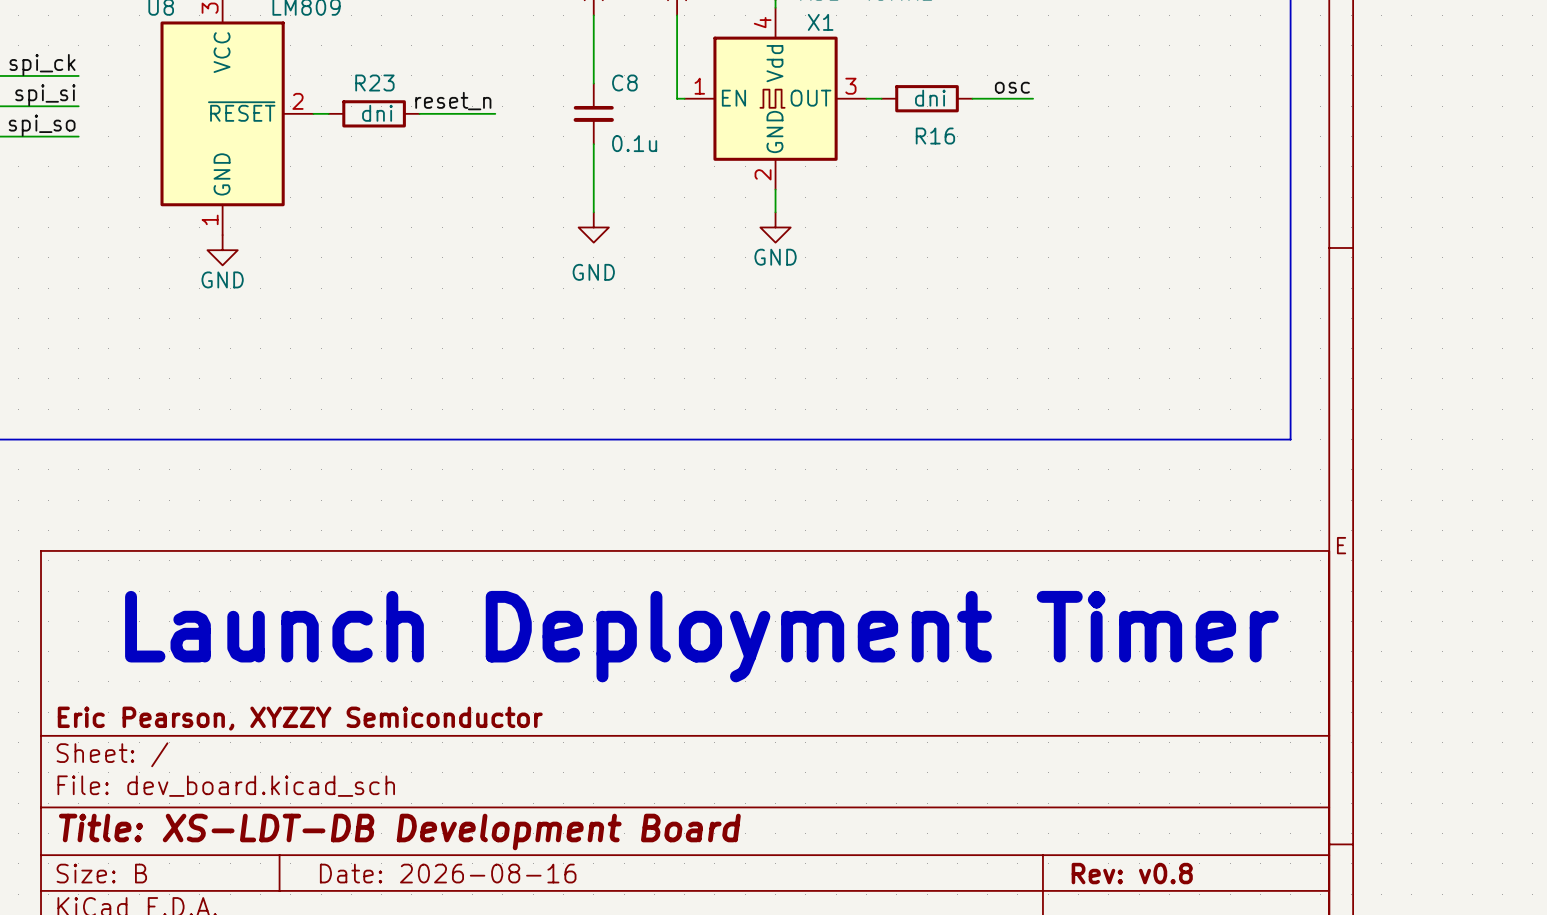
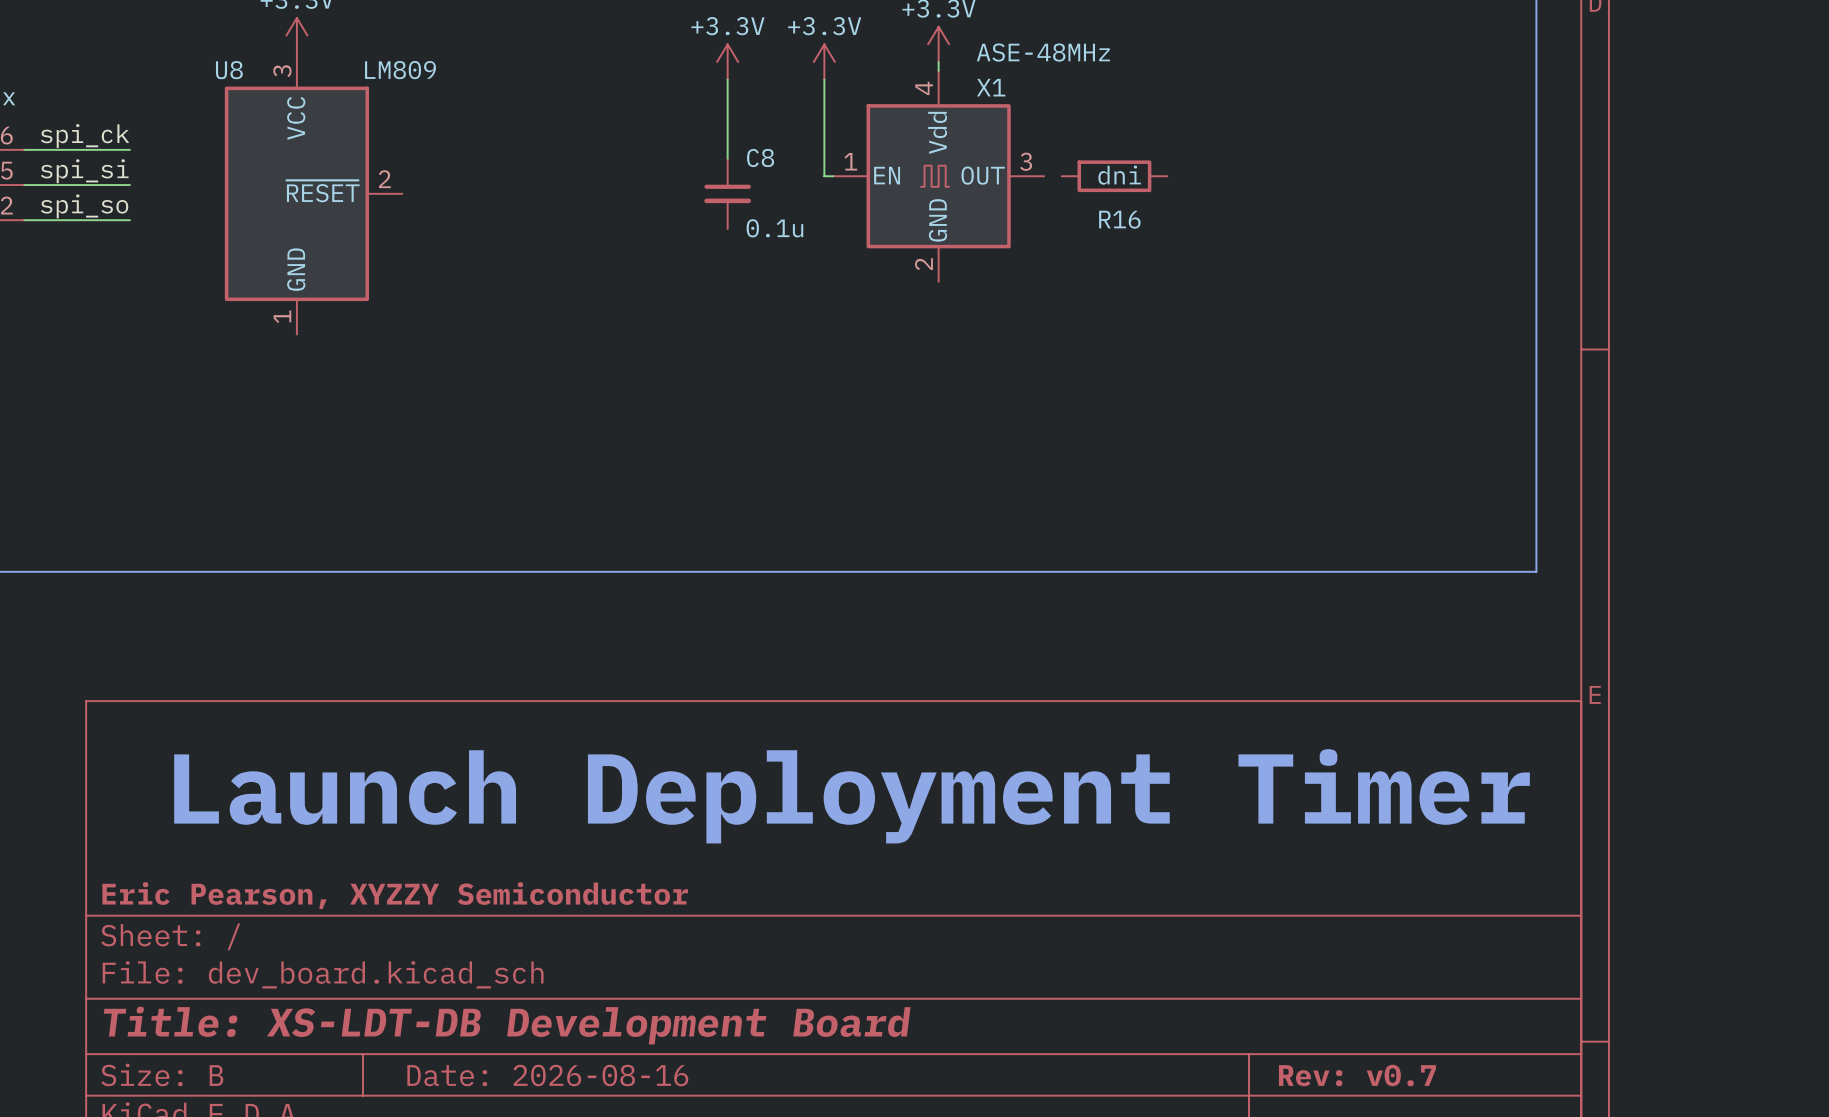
label: osc (1012, 87) -> none
wire: (866, 98) (881, 98) -> none
wire: (972, 98) (1033, 98) -> none
label: reset_n (453, 101) -> none
wire: (313, 113) (328, 113) -> none
R23: dni (374, 113) -> none
wire: (419, 113) (495, 113) -> none
wire: (593, 144) (593, 212) -> none
wire: (775, 189) (775, 212) -> none
power symbol: GND (593, 227) -> none
power symbol: GND (775, 227) -> none
power symbol: GND (222, 250) -> none
title block: Rev: v0.8 (1132, 873) -> Rev: v0.7 (1357, 1075)

